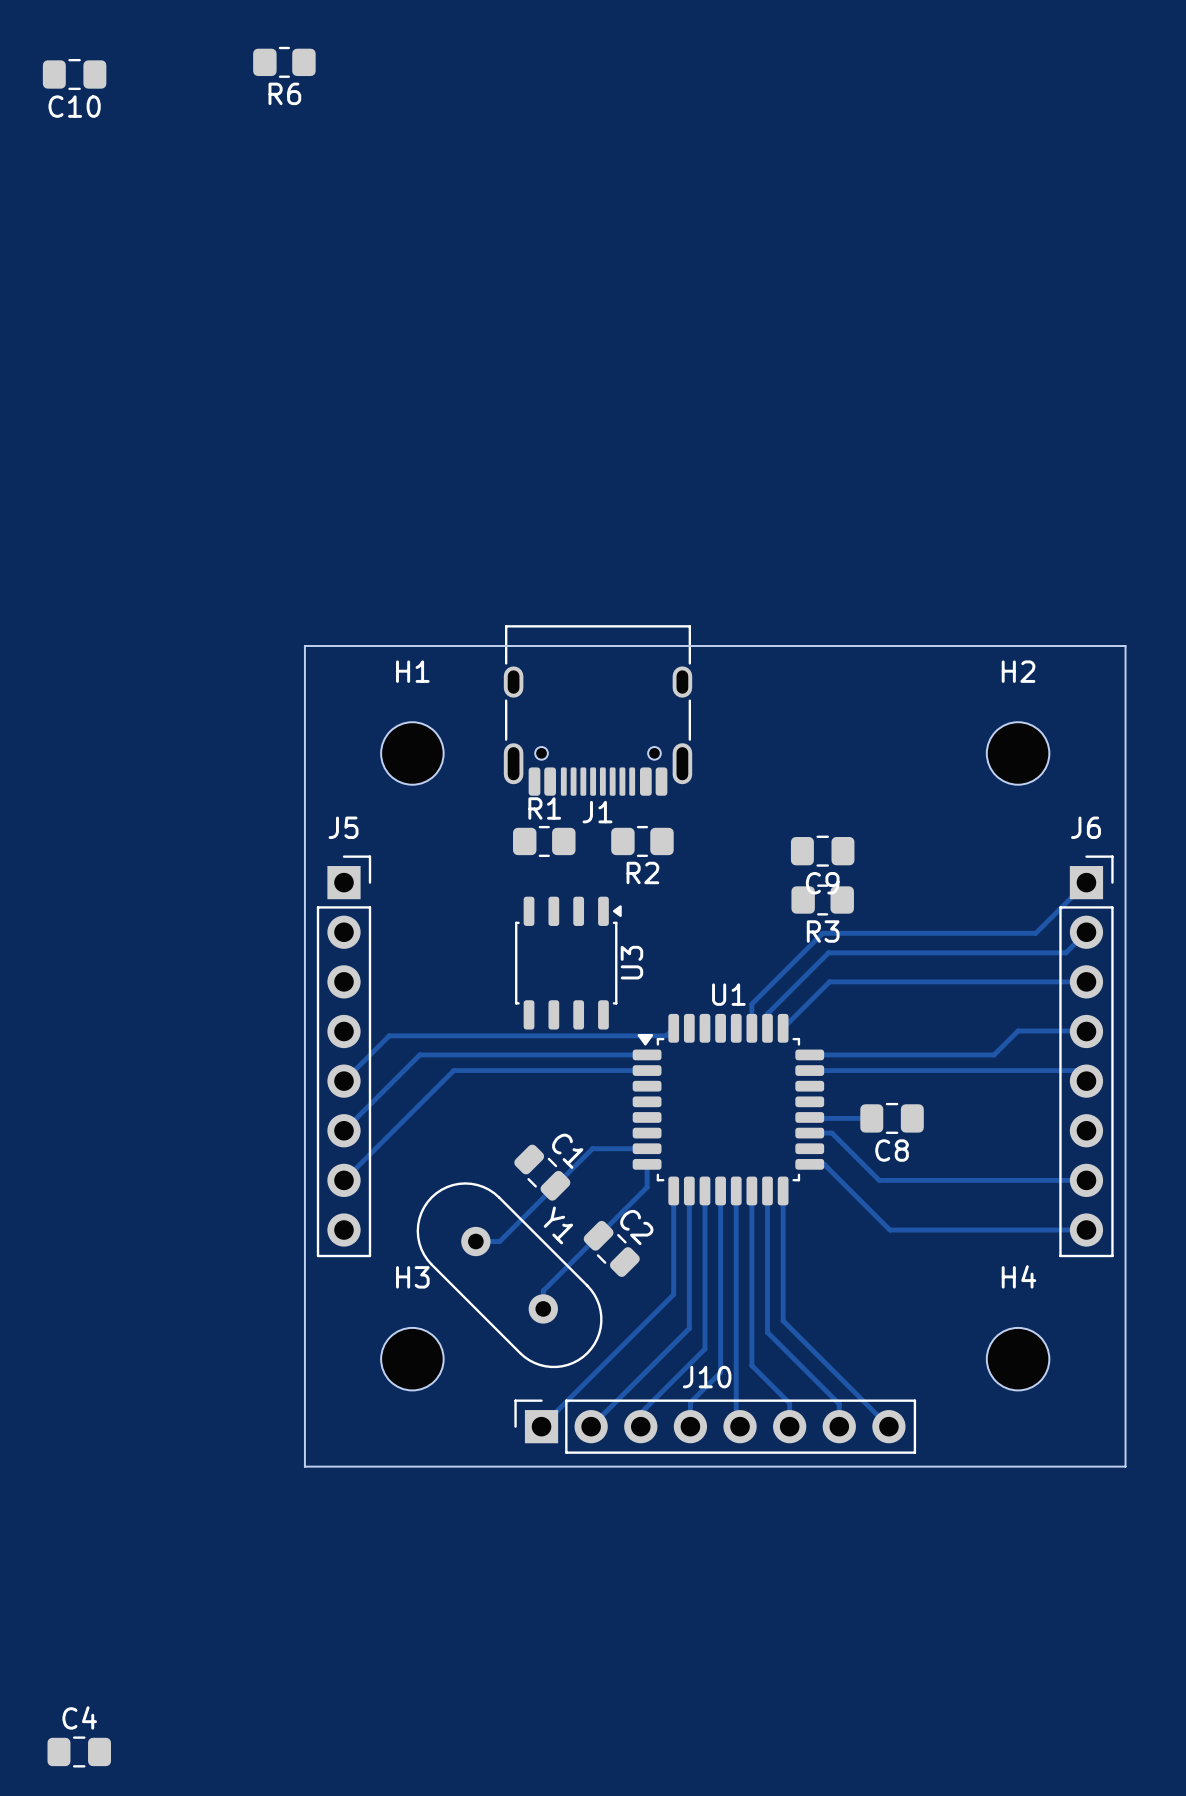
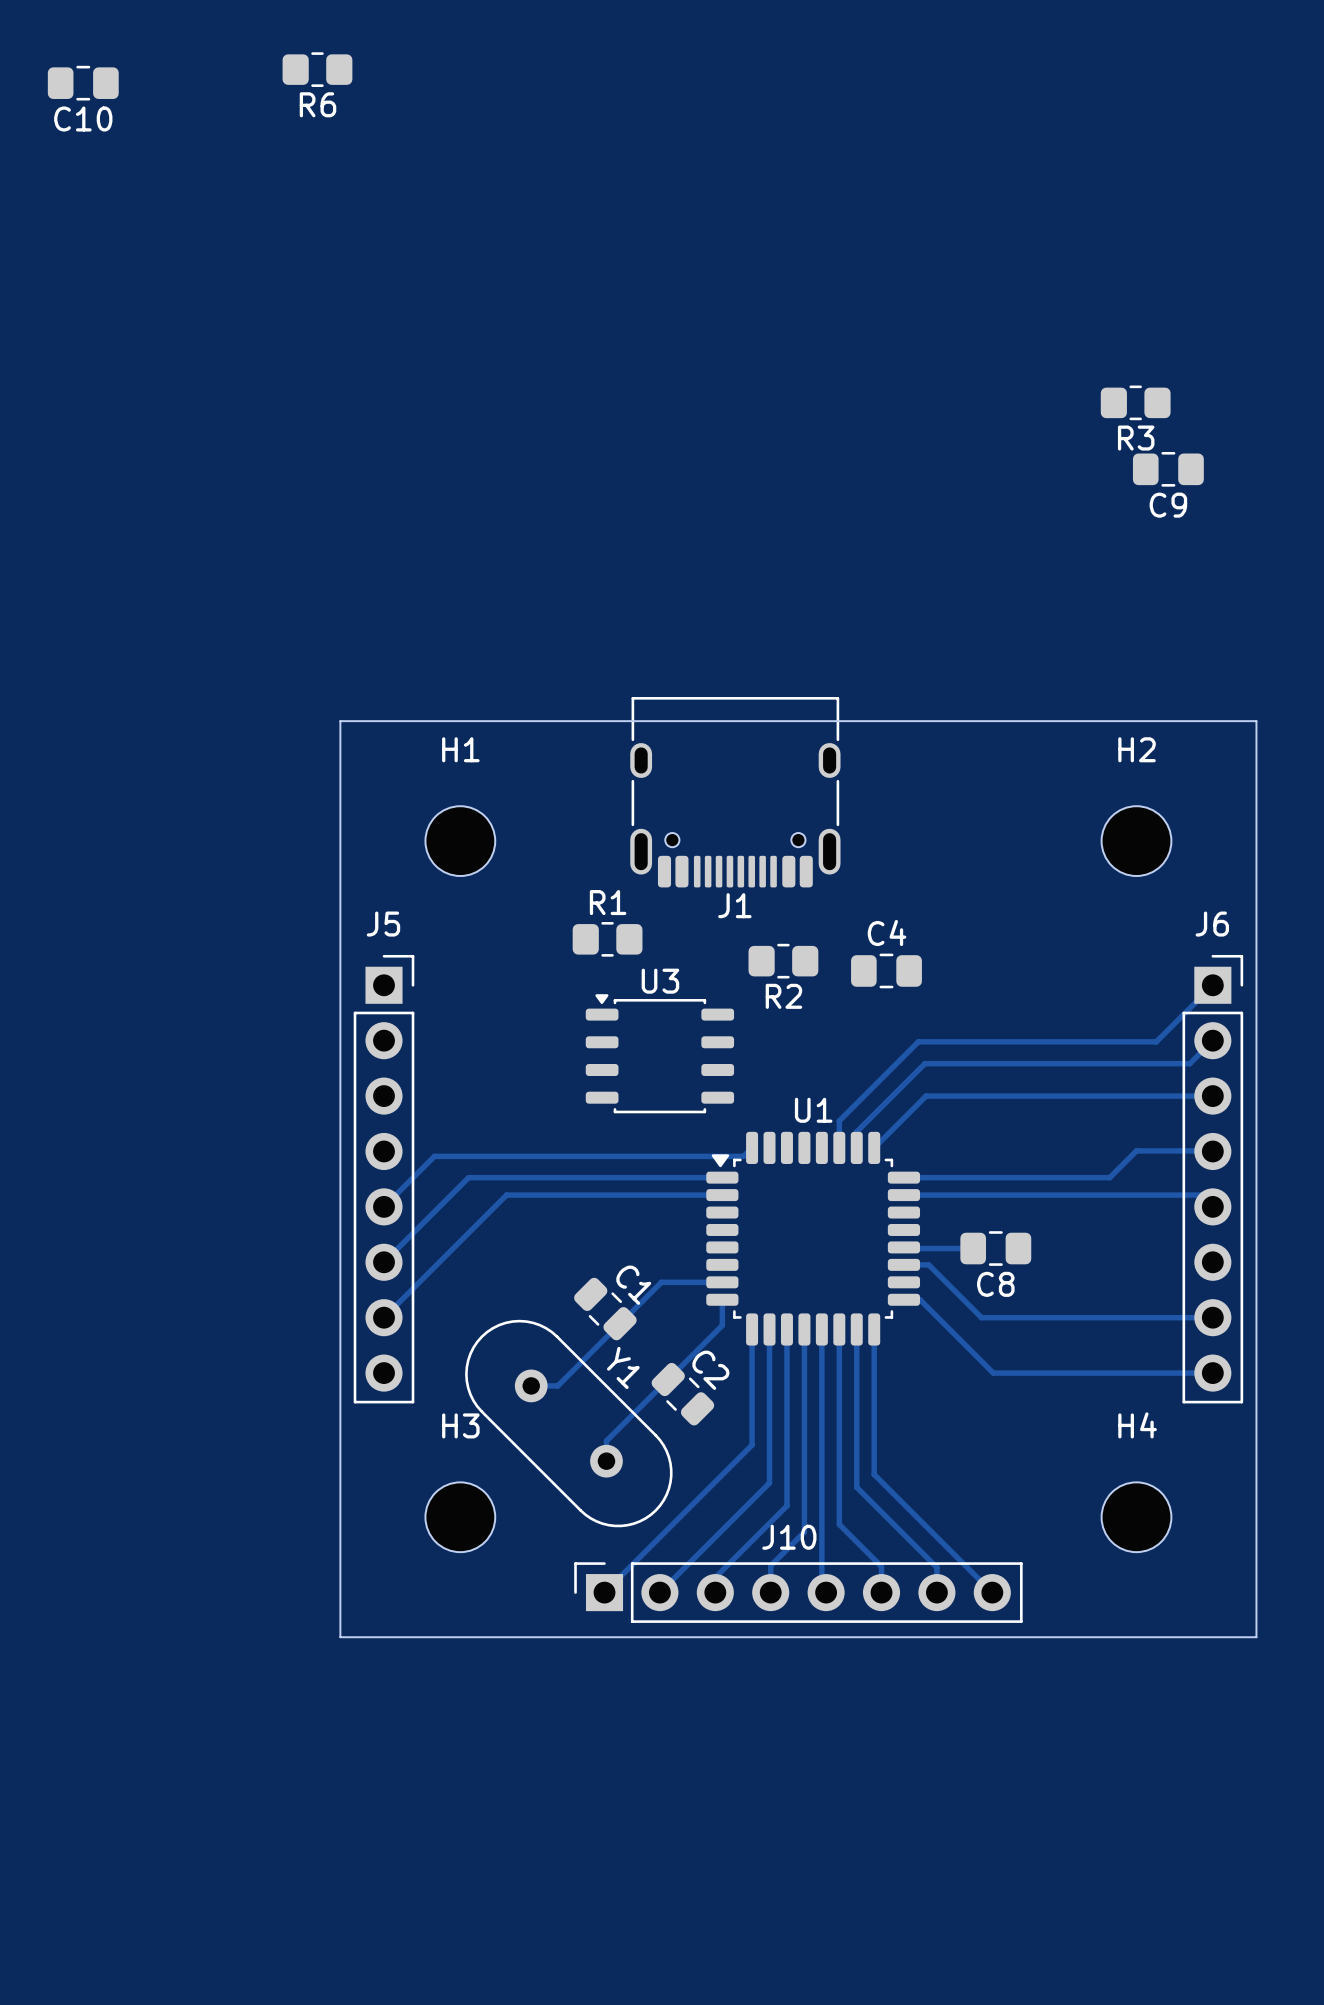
J1 position: (598, 710) -> (735, 792)
R2 position: (642, 841) -> (783, 961)
C9 position: (822, 851) -> (1168, 469)
R3 position: (822, 900) -> (1135, 402)
U3 rotation: 0° (568, 963) -> 90° counterclockwise (659, 1053)
C4 position: (79, 1751) -> (886, 970)

